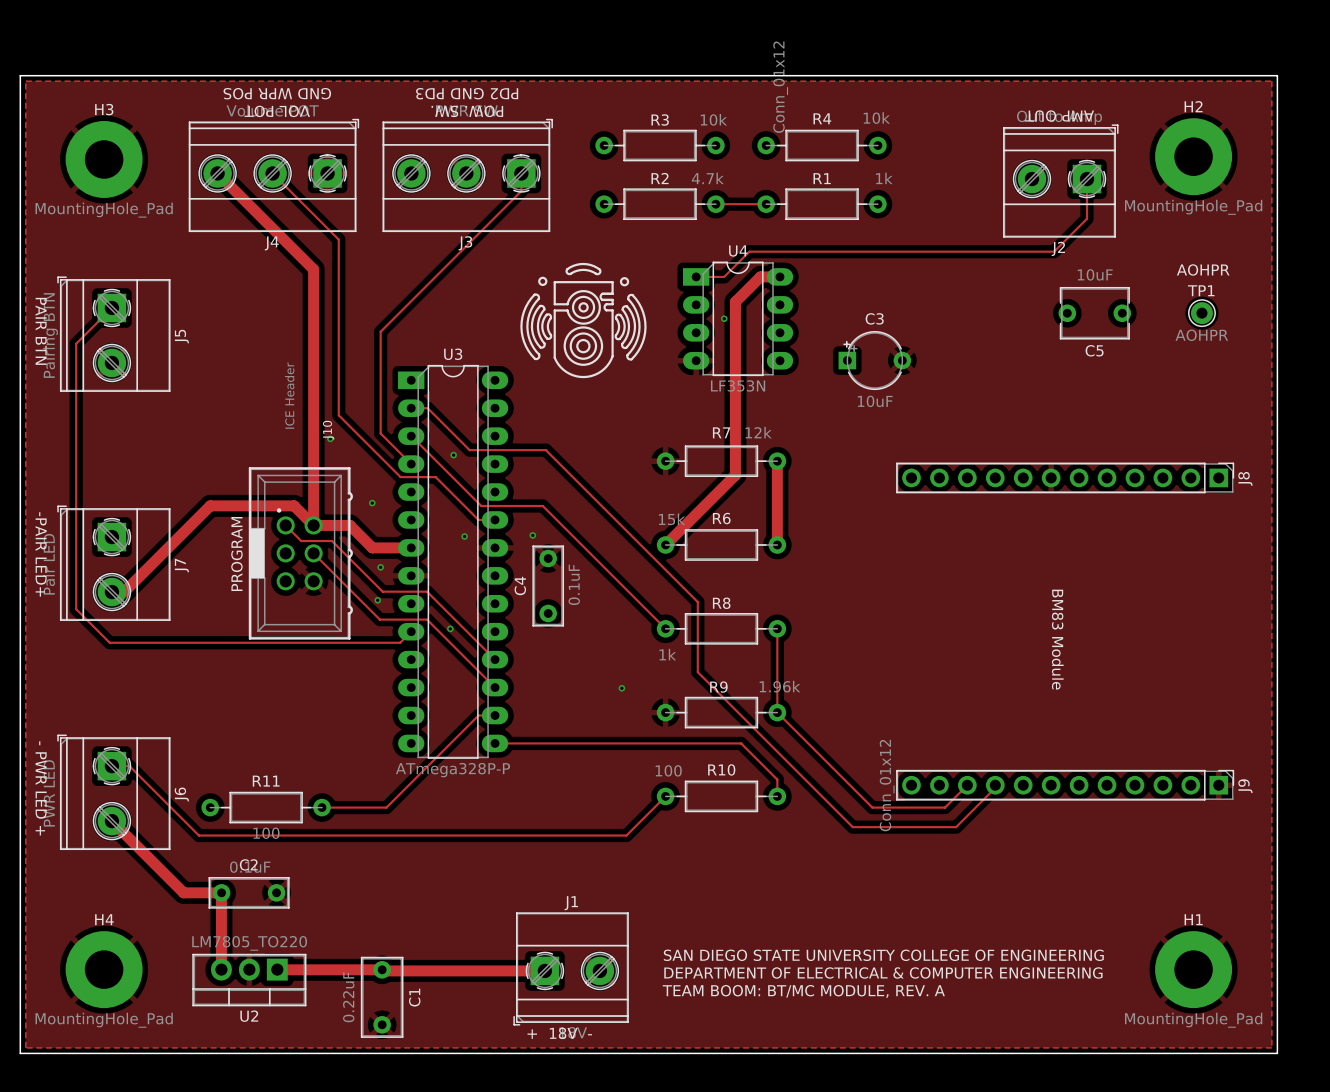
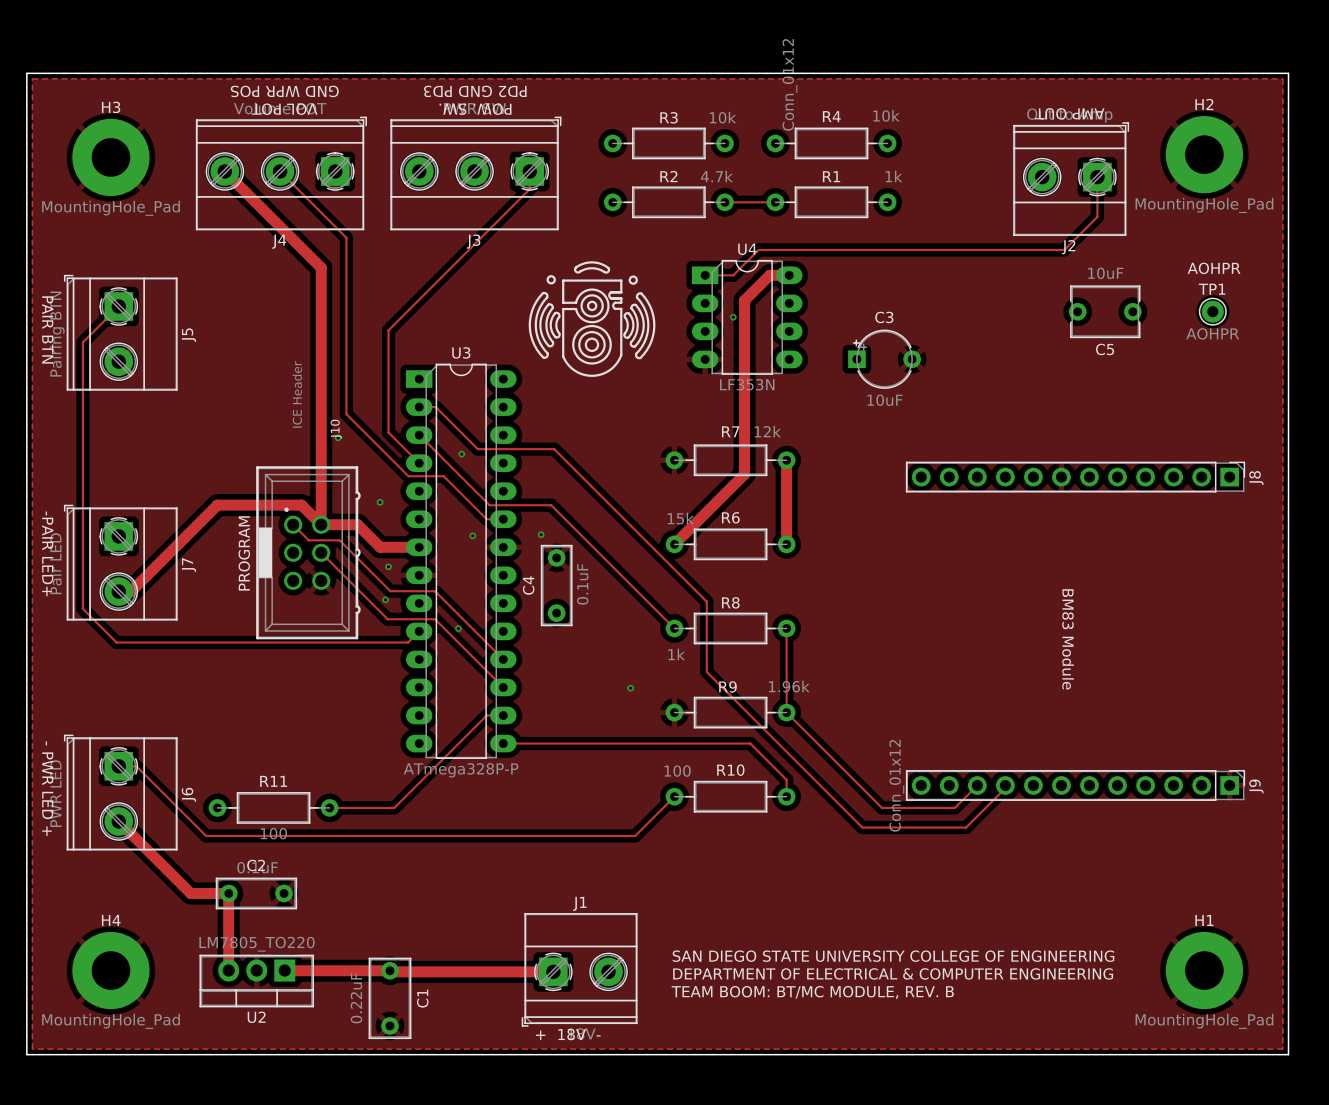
text: TEAM BOOM: BT/MC MODULE, REV. A (803, 991) -> TEAM BOOM: BT/MC MODULE, REV. B (812, 992)

